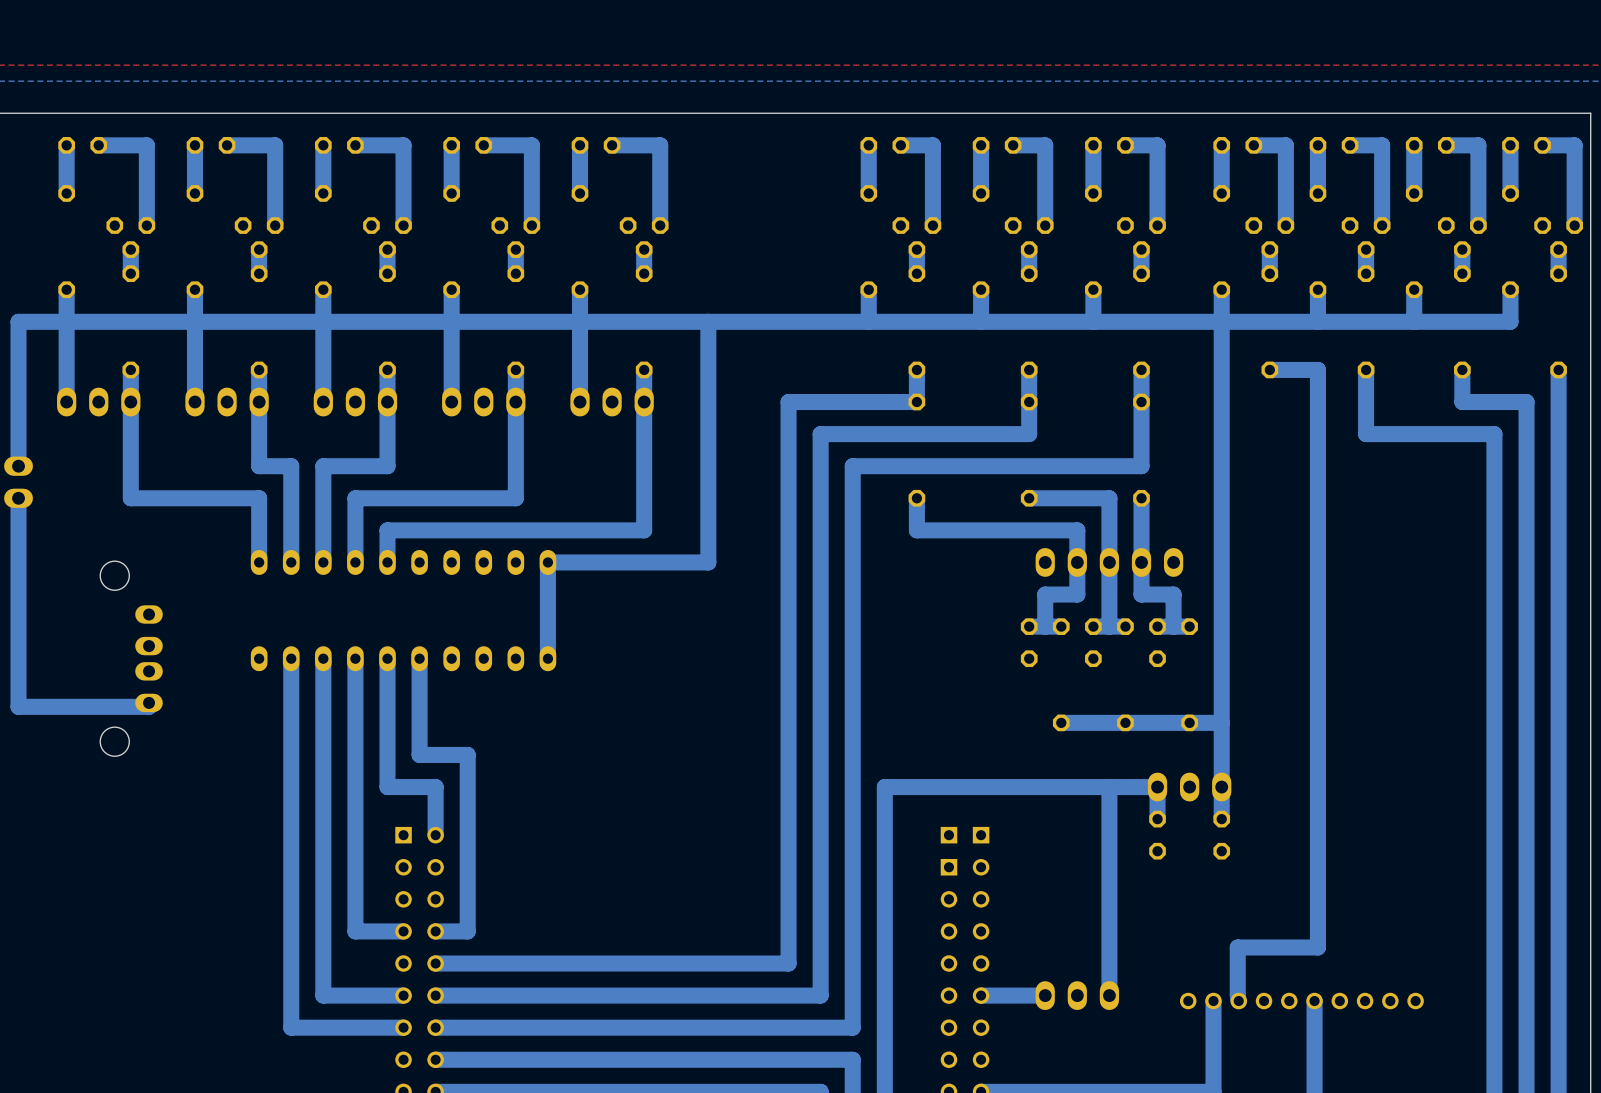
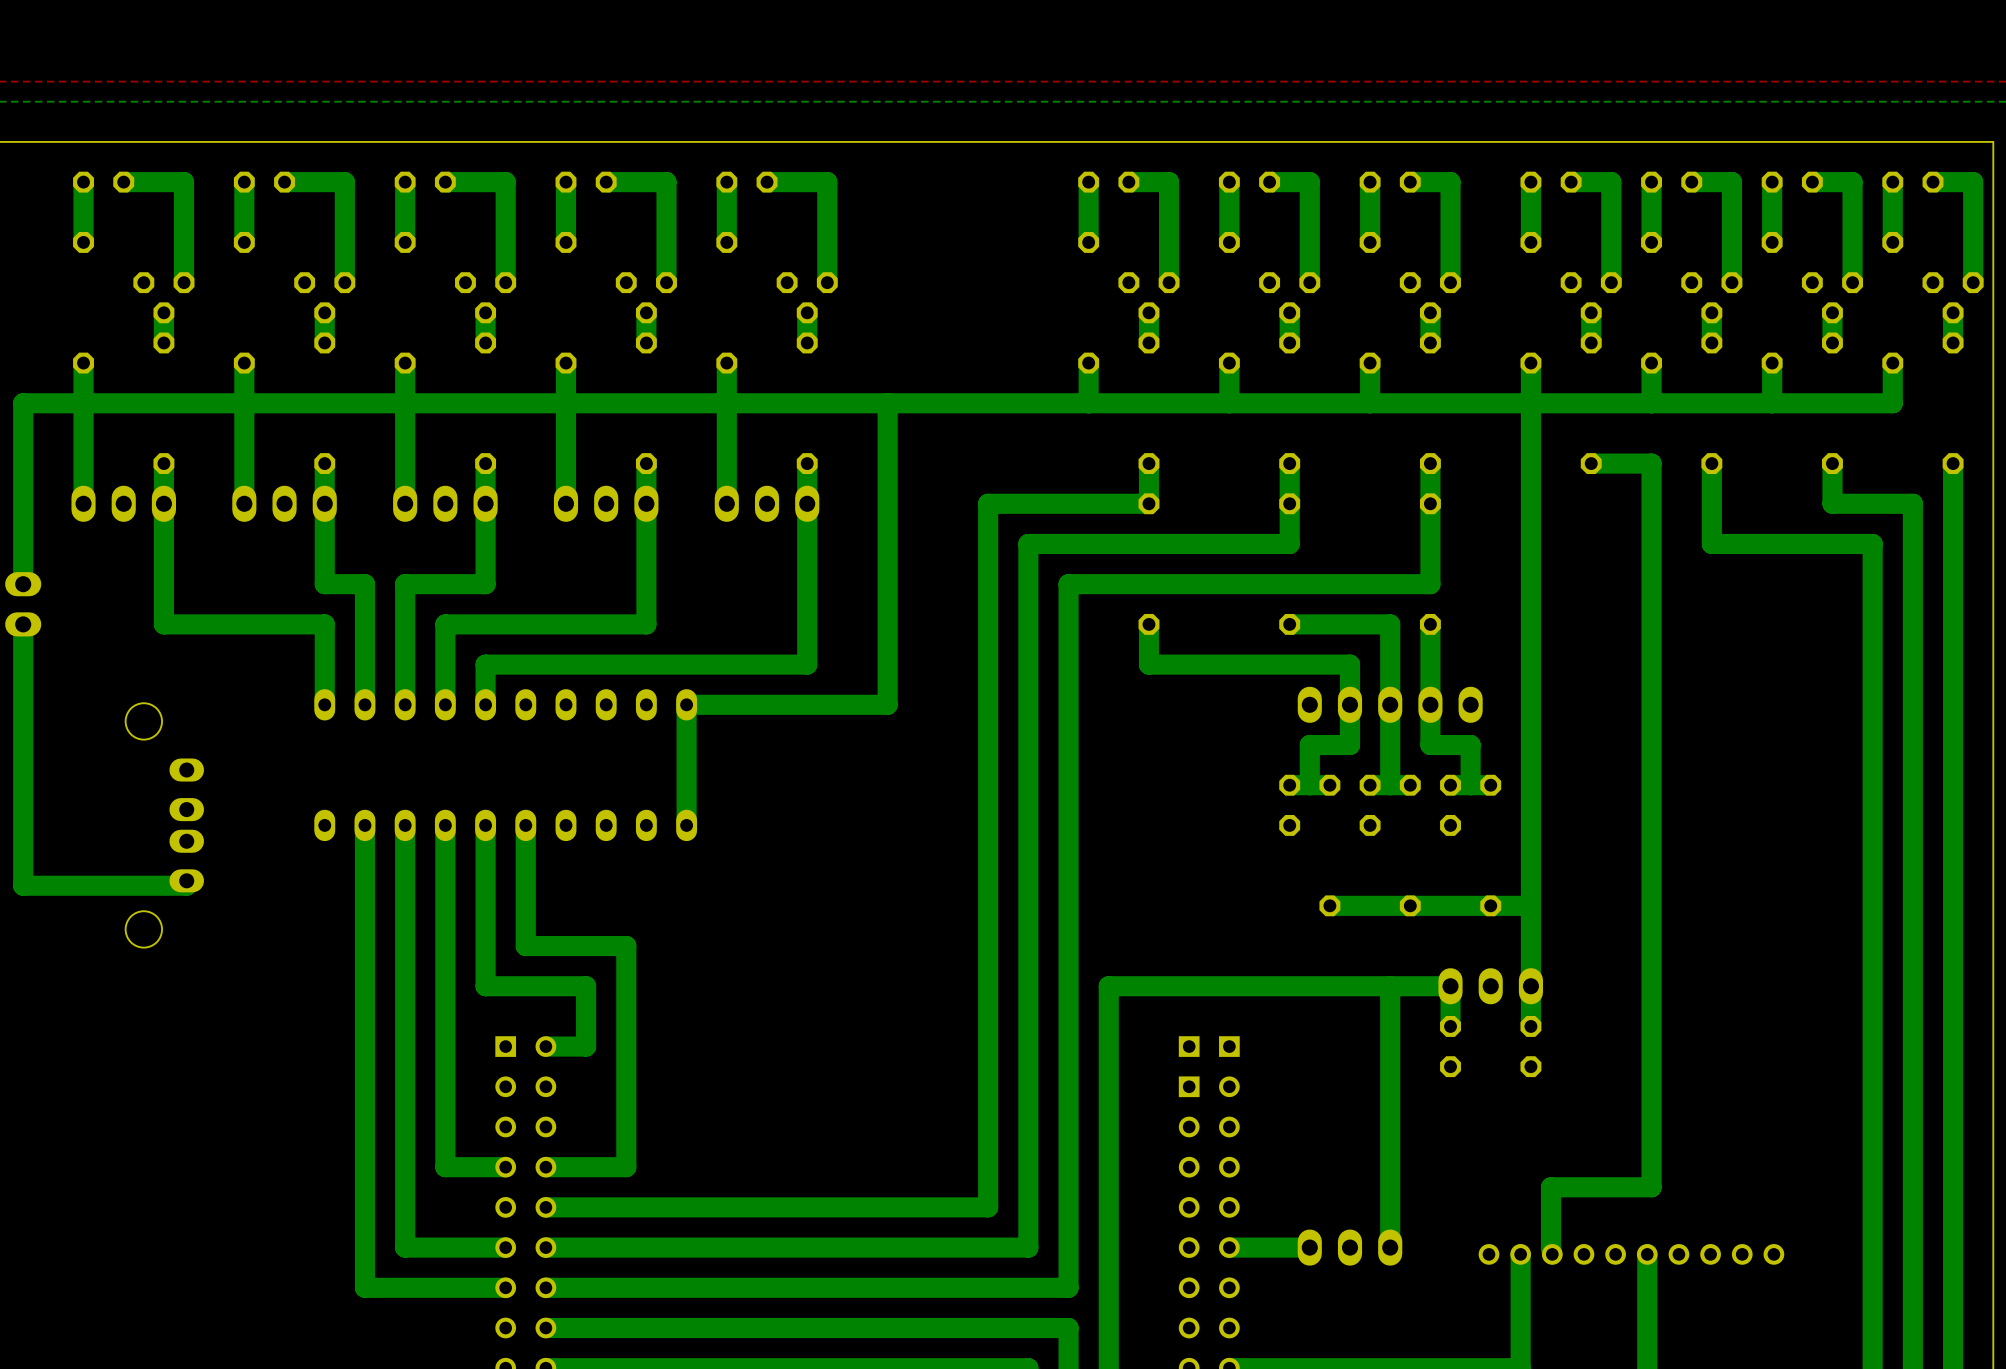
bottom track: (467, 754) (467, 787) -> (545, 986) (586, 986)
bottom track: (435, 787) (435, 835) -> (586, 1046) (545, 1046)
bottom track: (467, 835) (467, 931) -> (586, 946) (626, 946) (626, 1167) (586, 1167)

